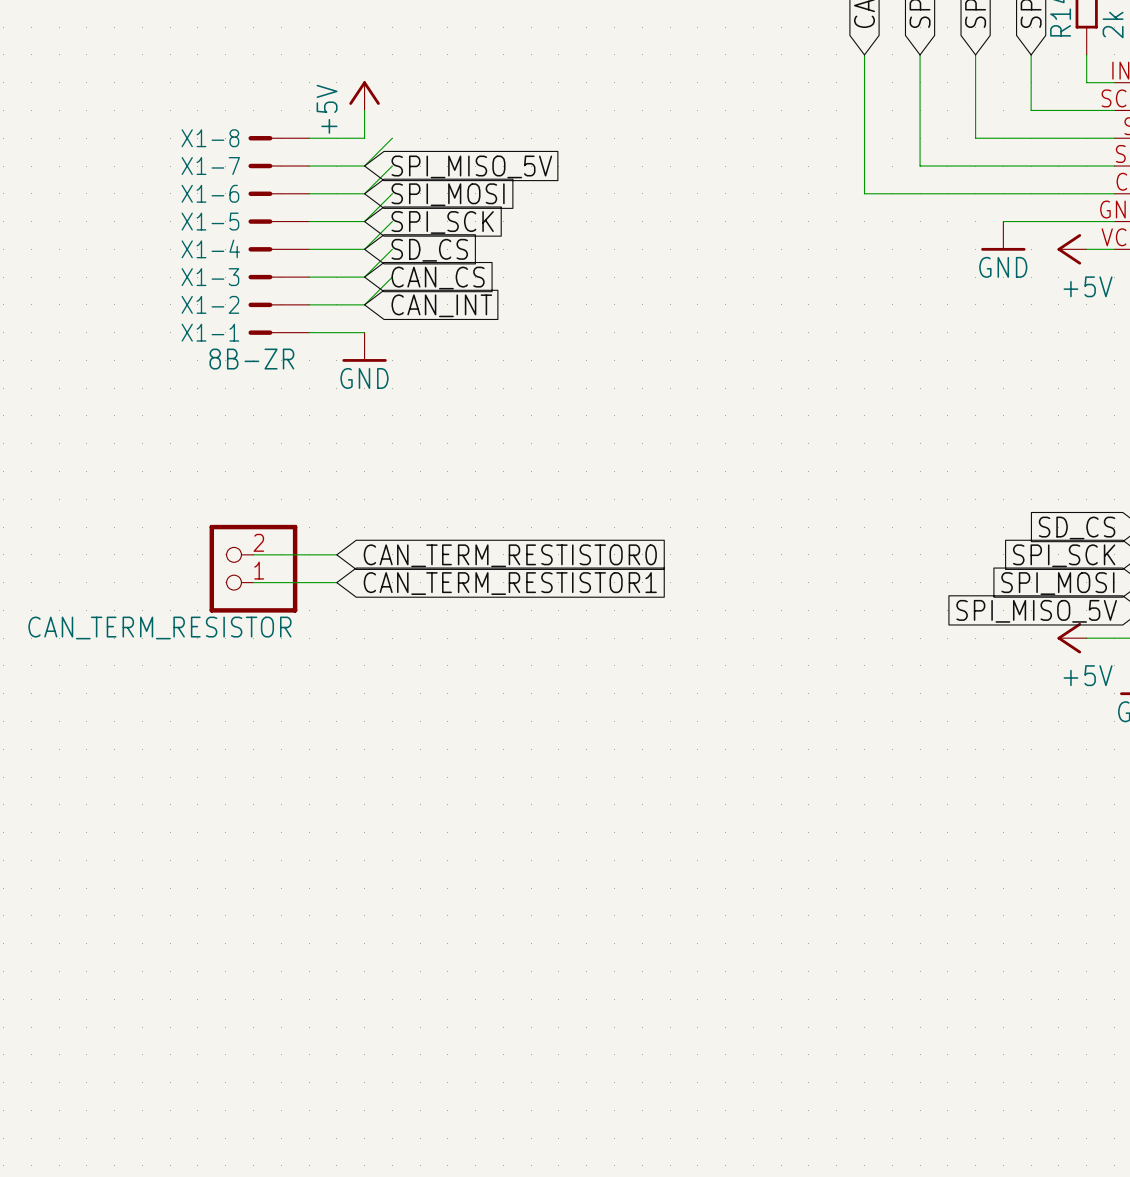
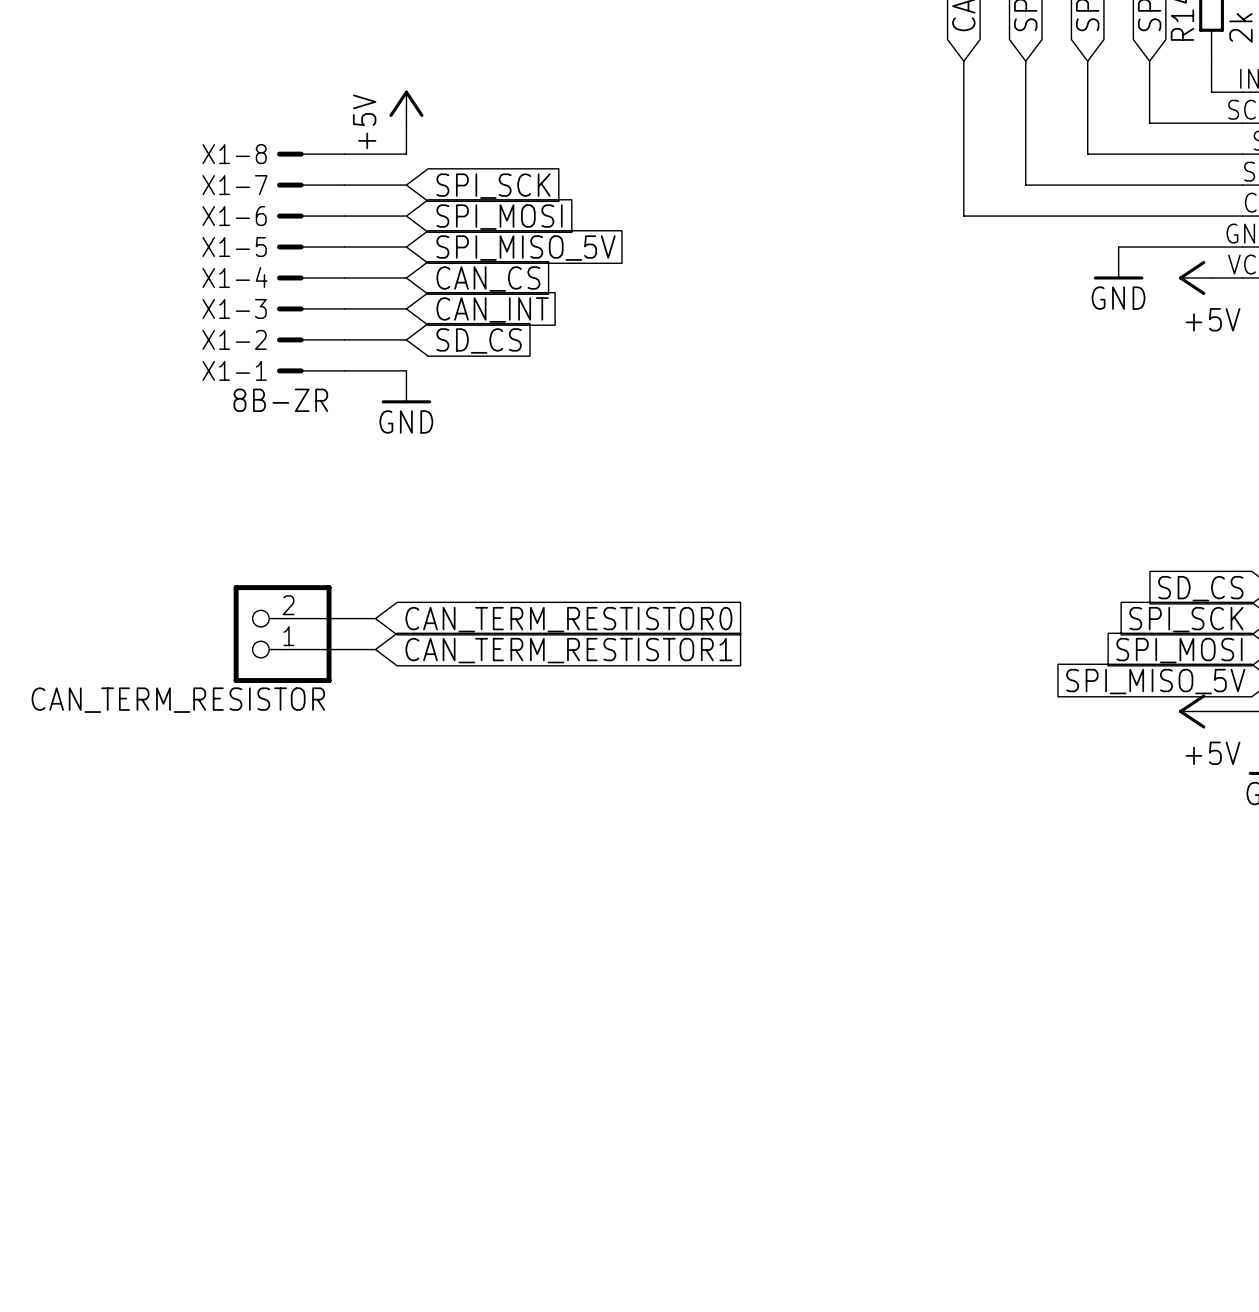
wire: (392, 138) (364, 166) -> none
wire: (392, 166) (364, 193) -> none
global label: SPI_MISO_5V (471, 166) -> SPI_SCK (493, 186)
wire: (392, 193) (364, 221) -> none
wire: (392, 221) (364, 249) -> none
global label: SPI_SCK (442, 222) -> SPI_MISO_5V (526, 248)
wire: (392, 249) (364, 277) -> none
global label: SD_CS (429, 250) -> CAN_CS (488, 279)
wire: (392, 277) (364, 304) -> none
global label: CAN_CS (438, 278) -> CAN_INT (492, 309)
global label: CAN_INT (441, 305) -> SD_CS (479, 340)

